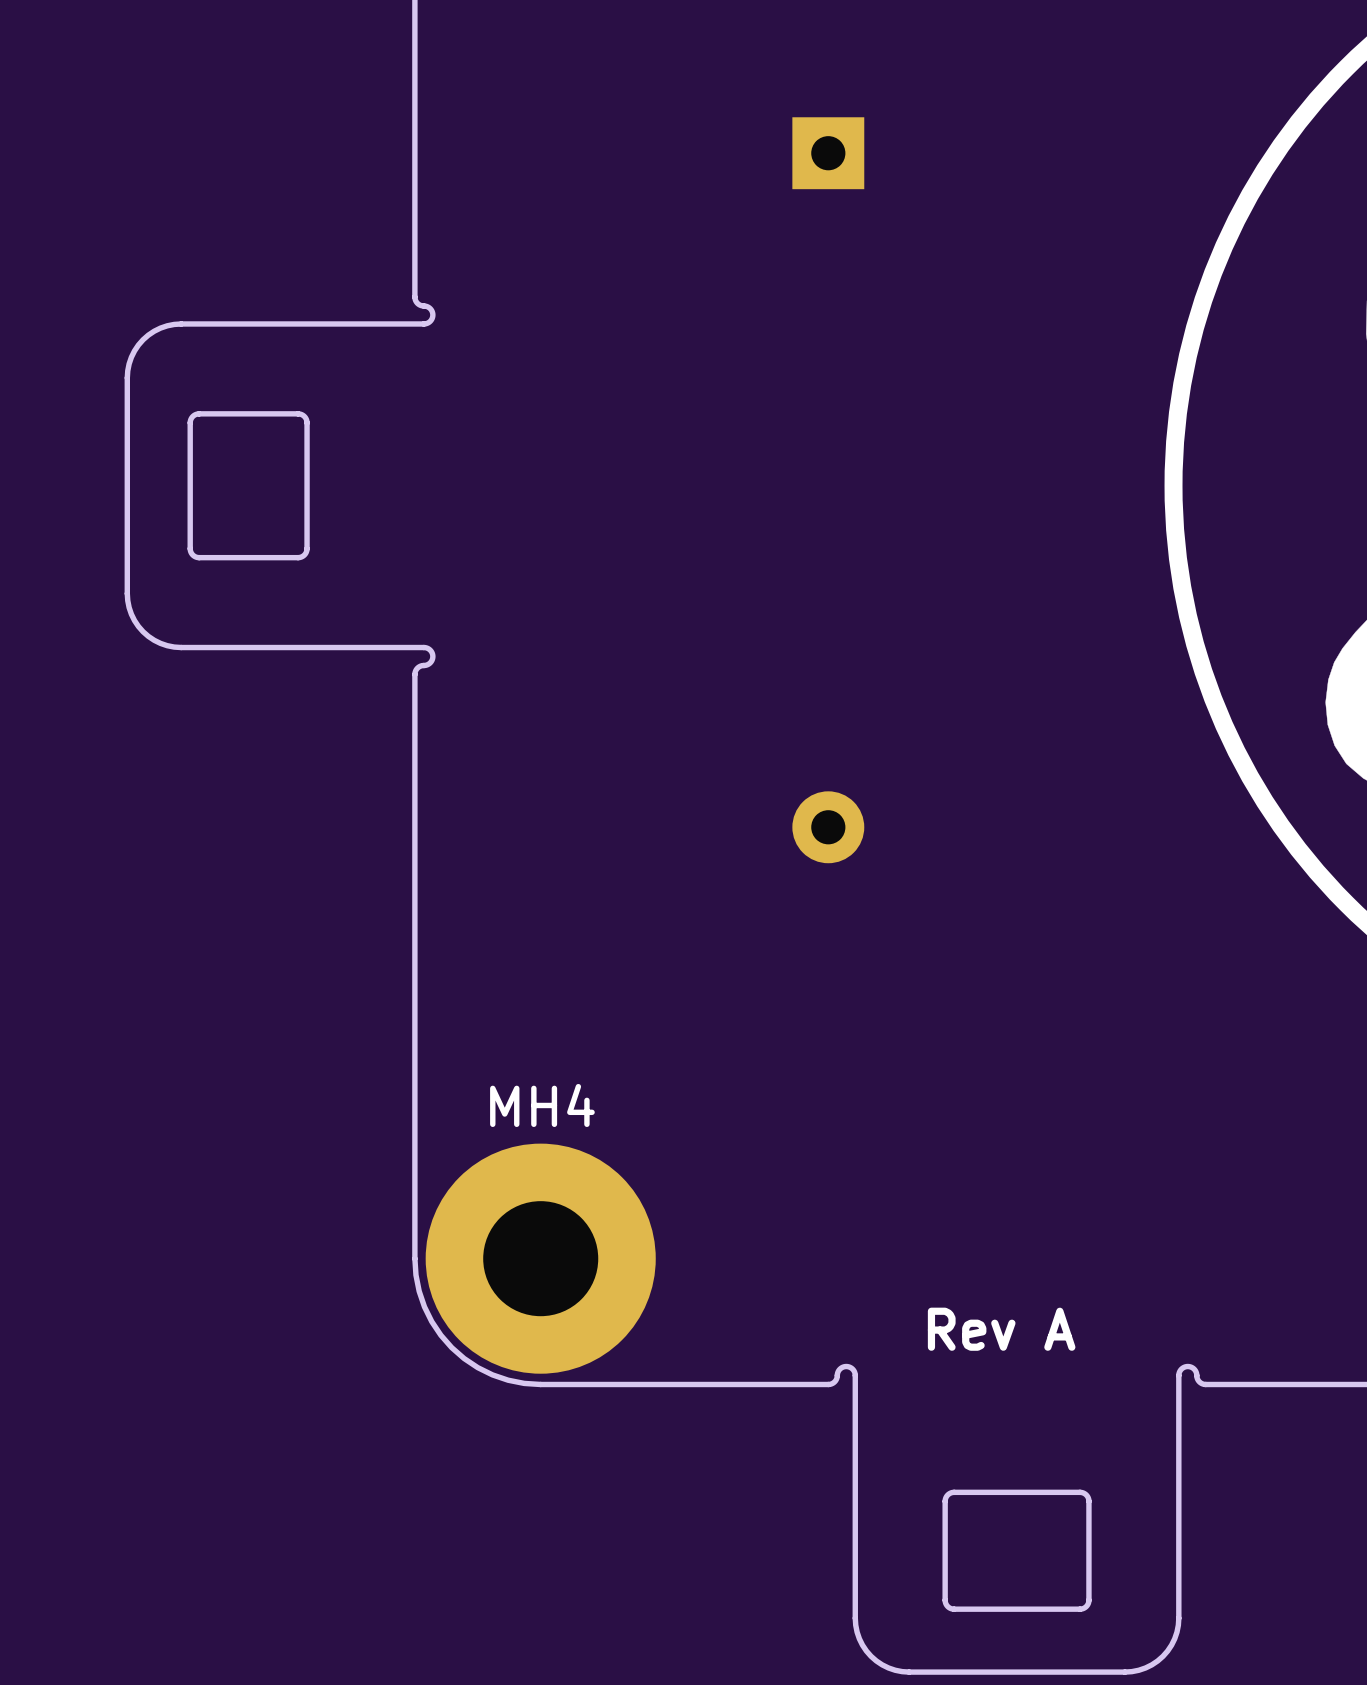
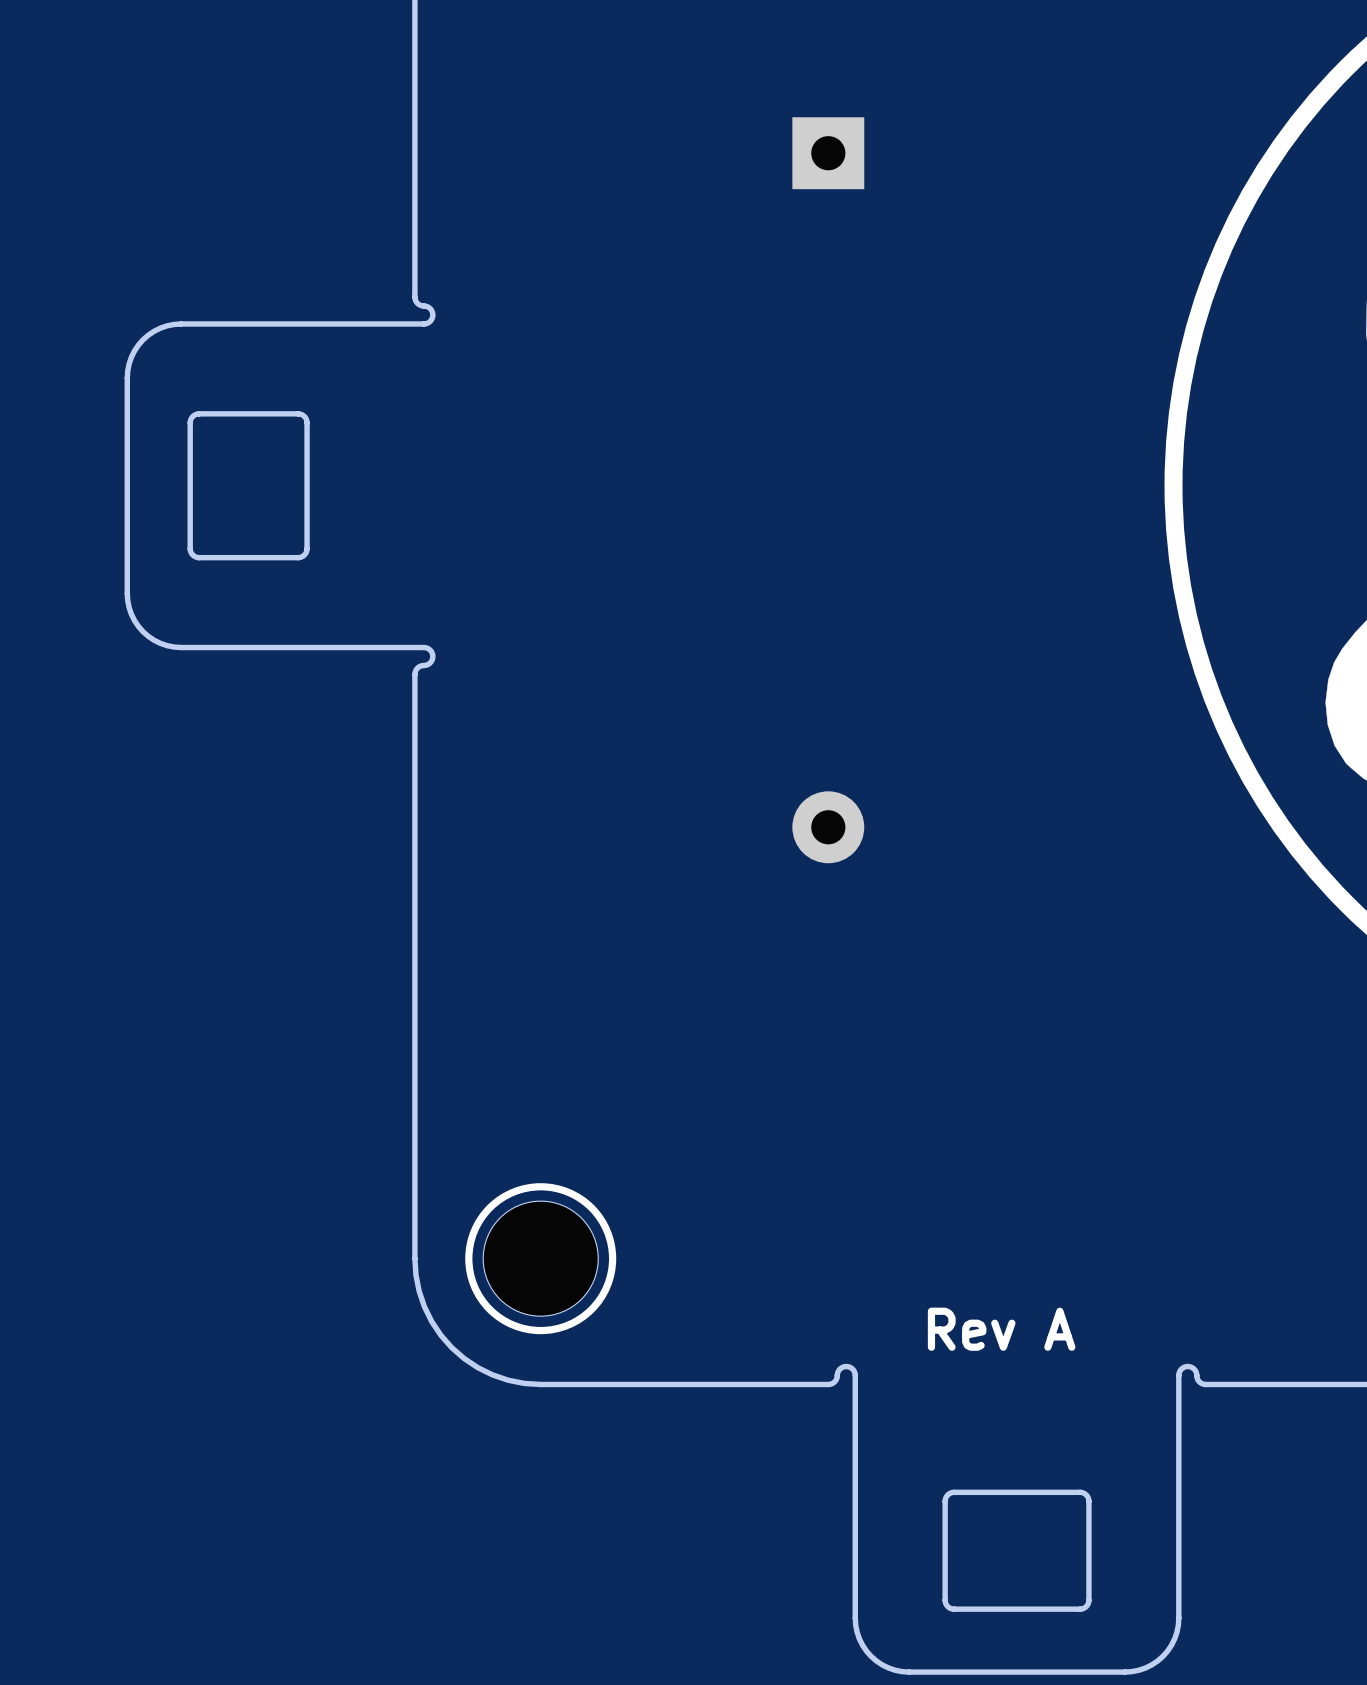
drawing: none -> [465, 1183, 617, 1335]
MH4: (540, 1258) -> none
part: none -> (540, 1258)

